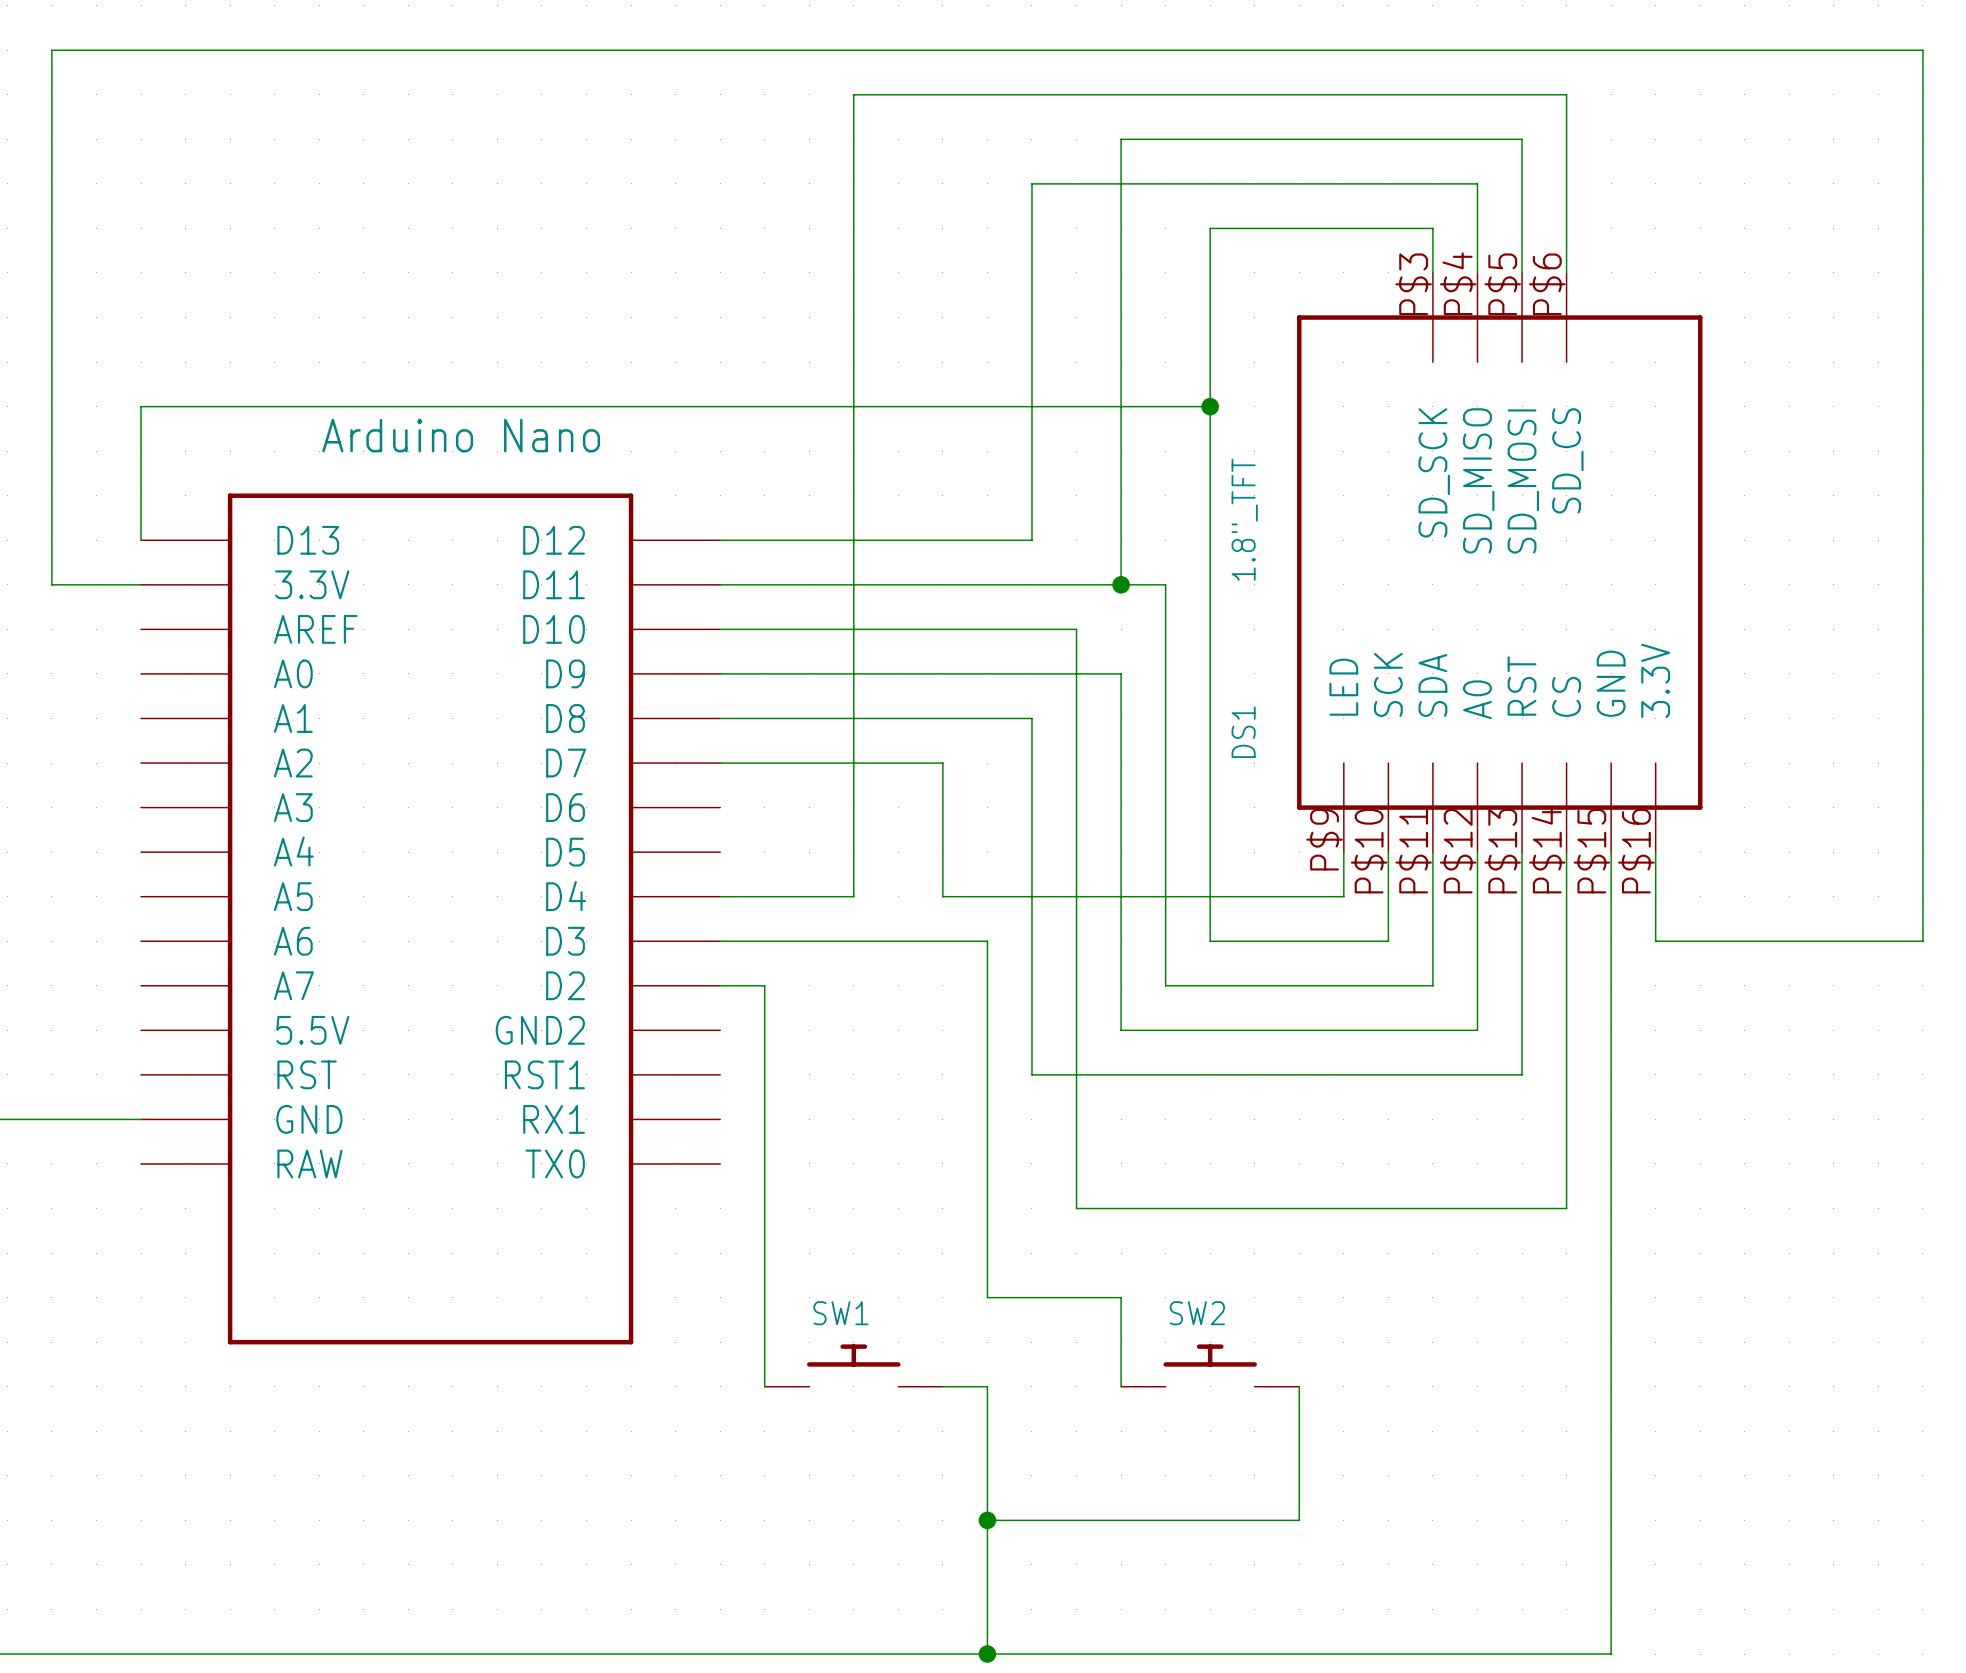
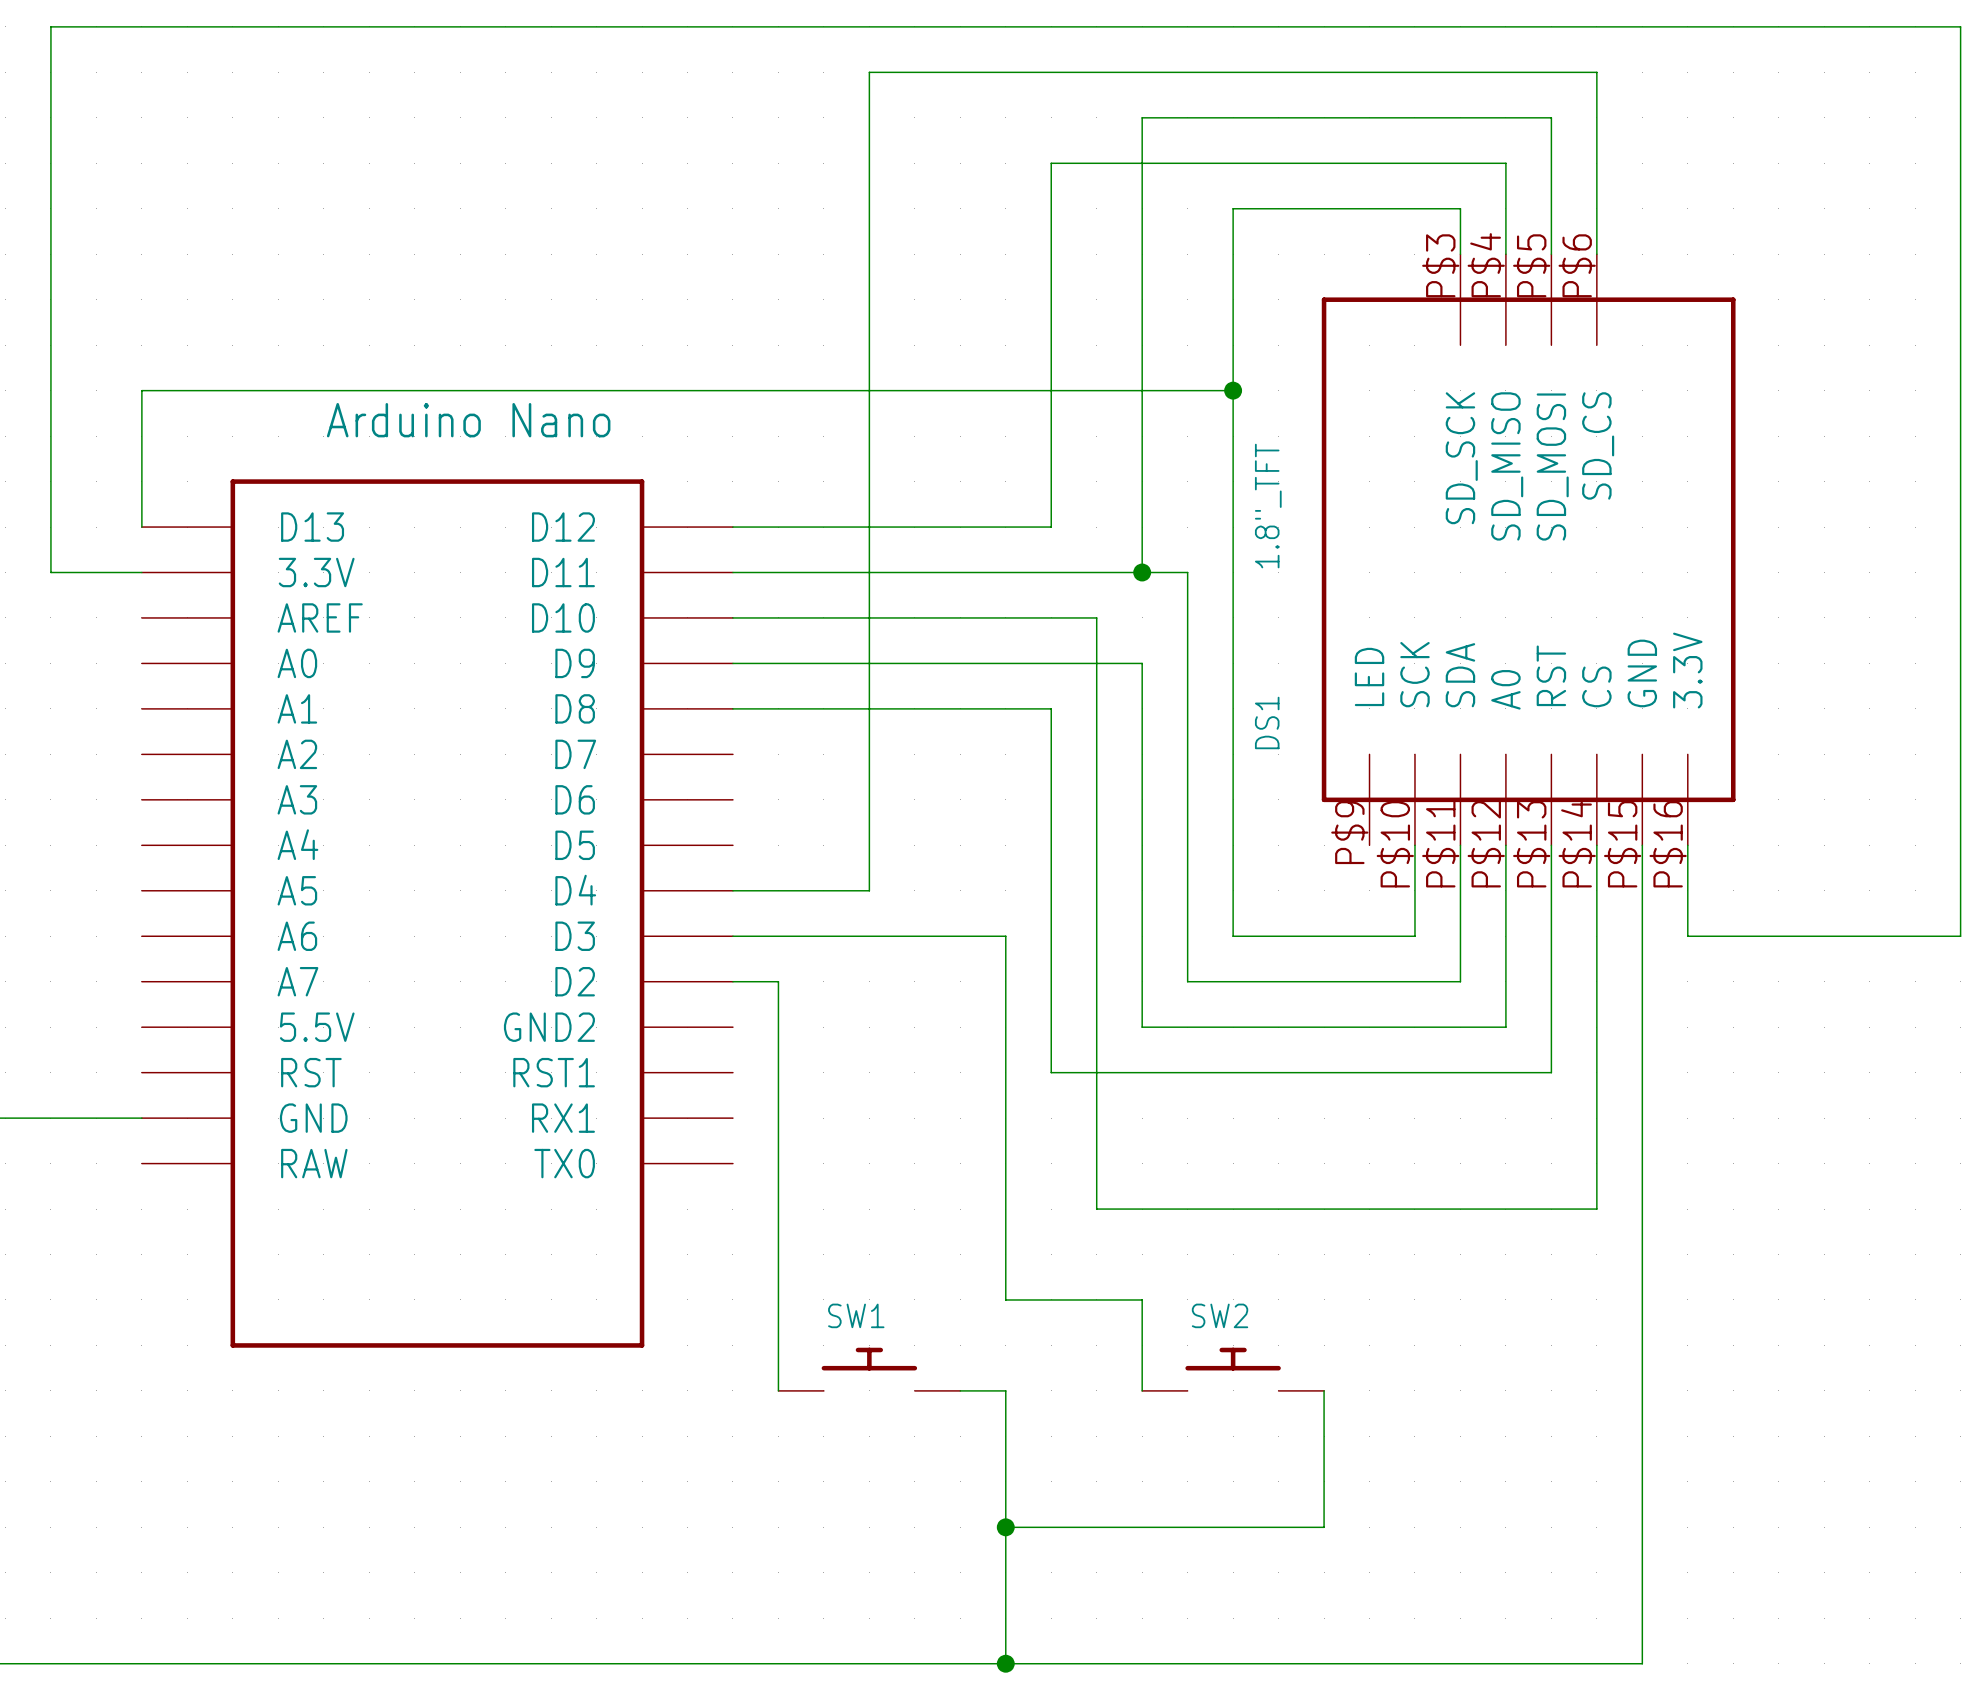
wire: (720, 763) (942, 763) (942, 896) (1343, 896) (1343, 852) -> none

